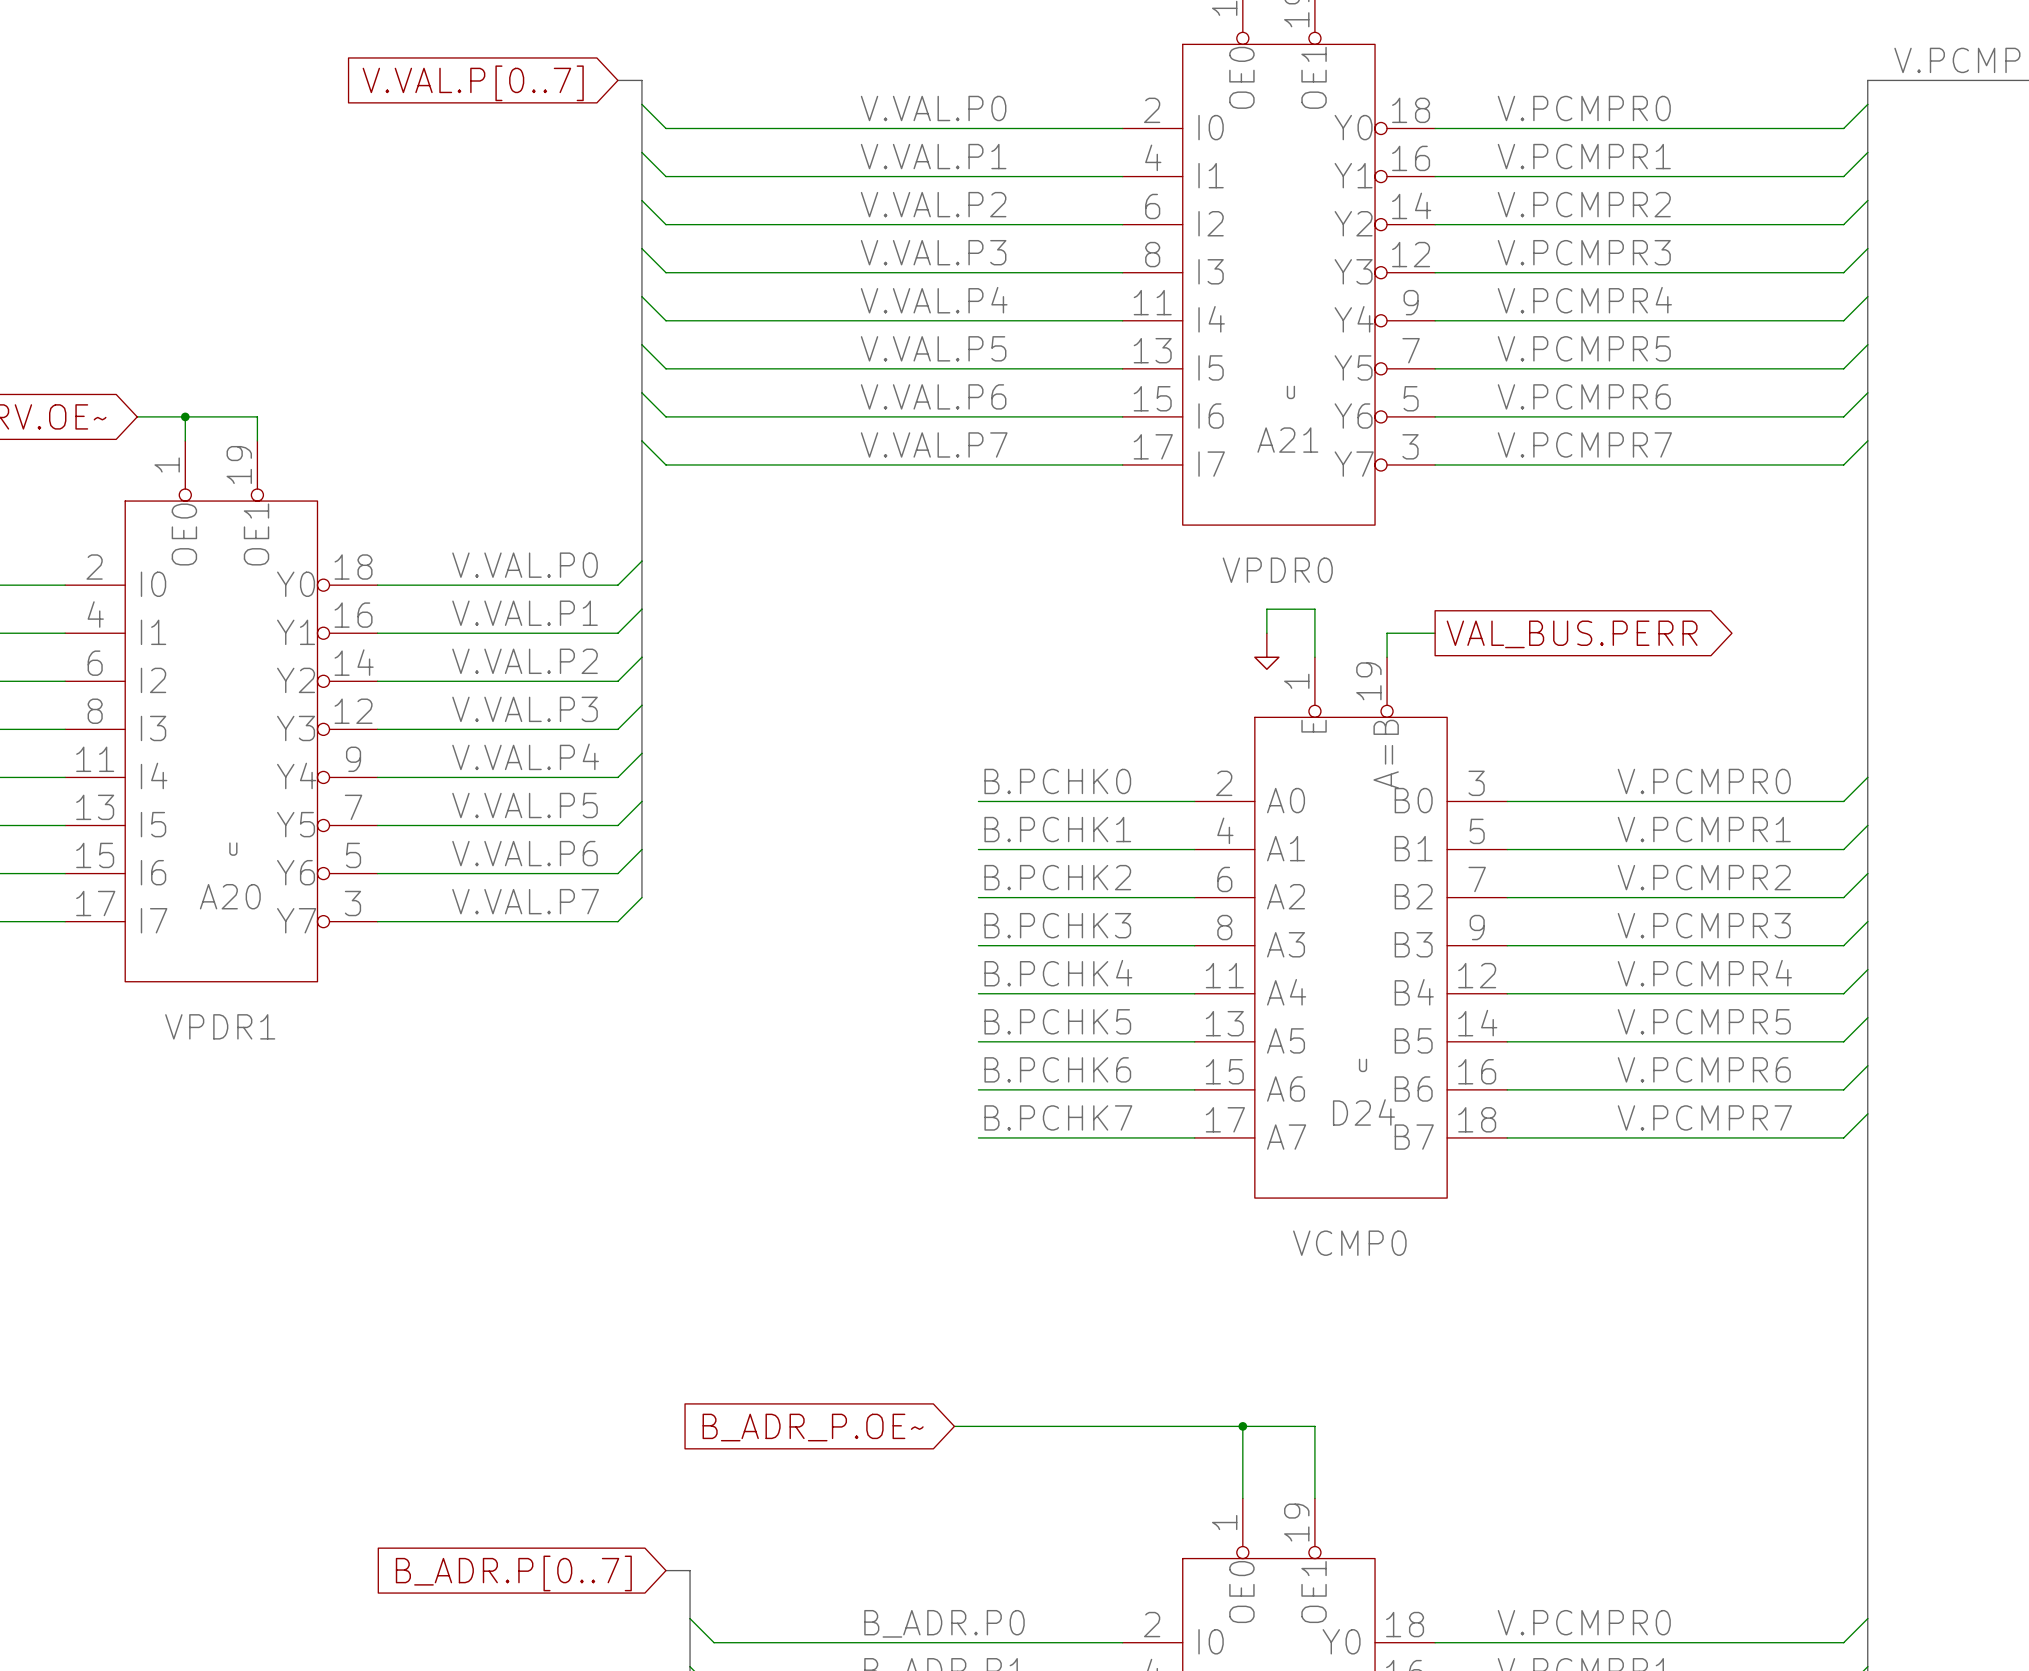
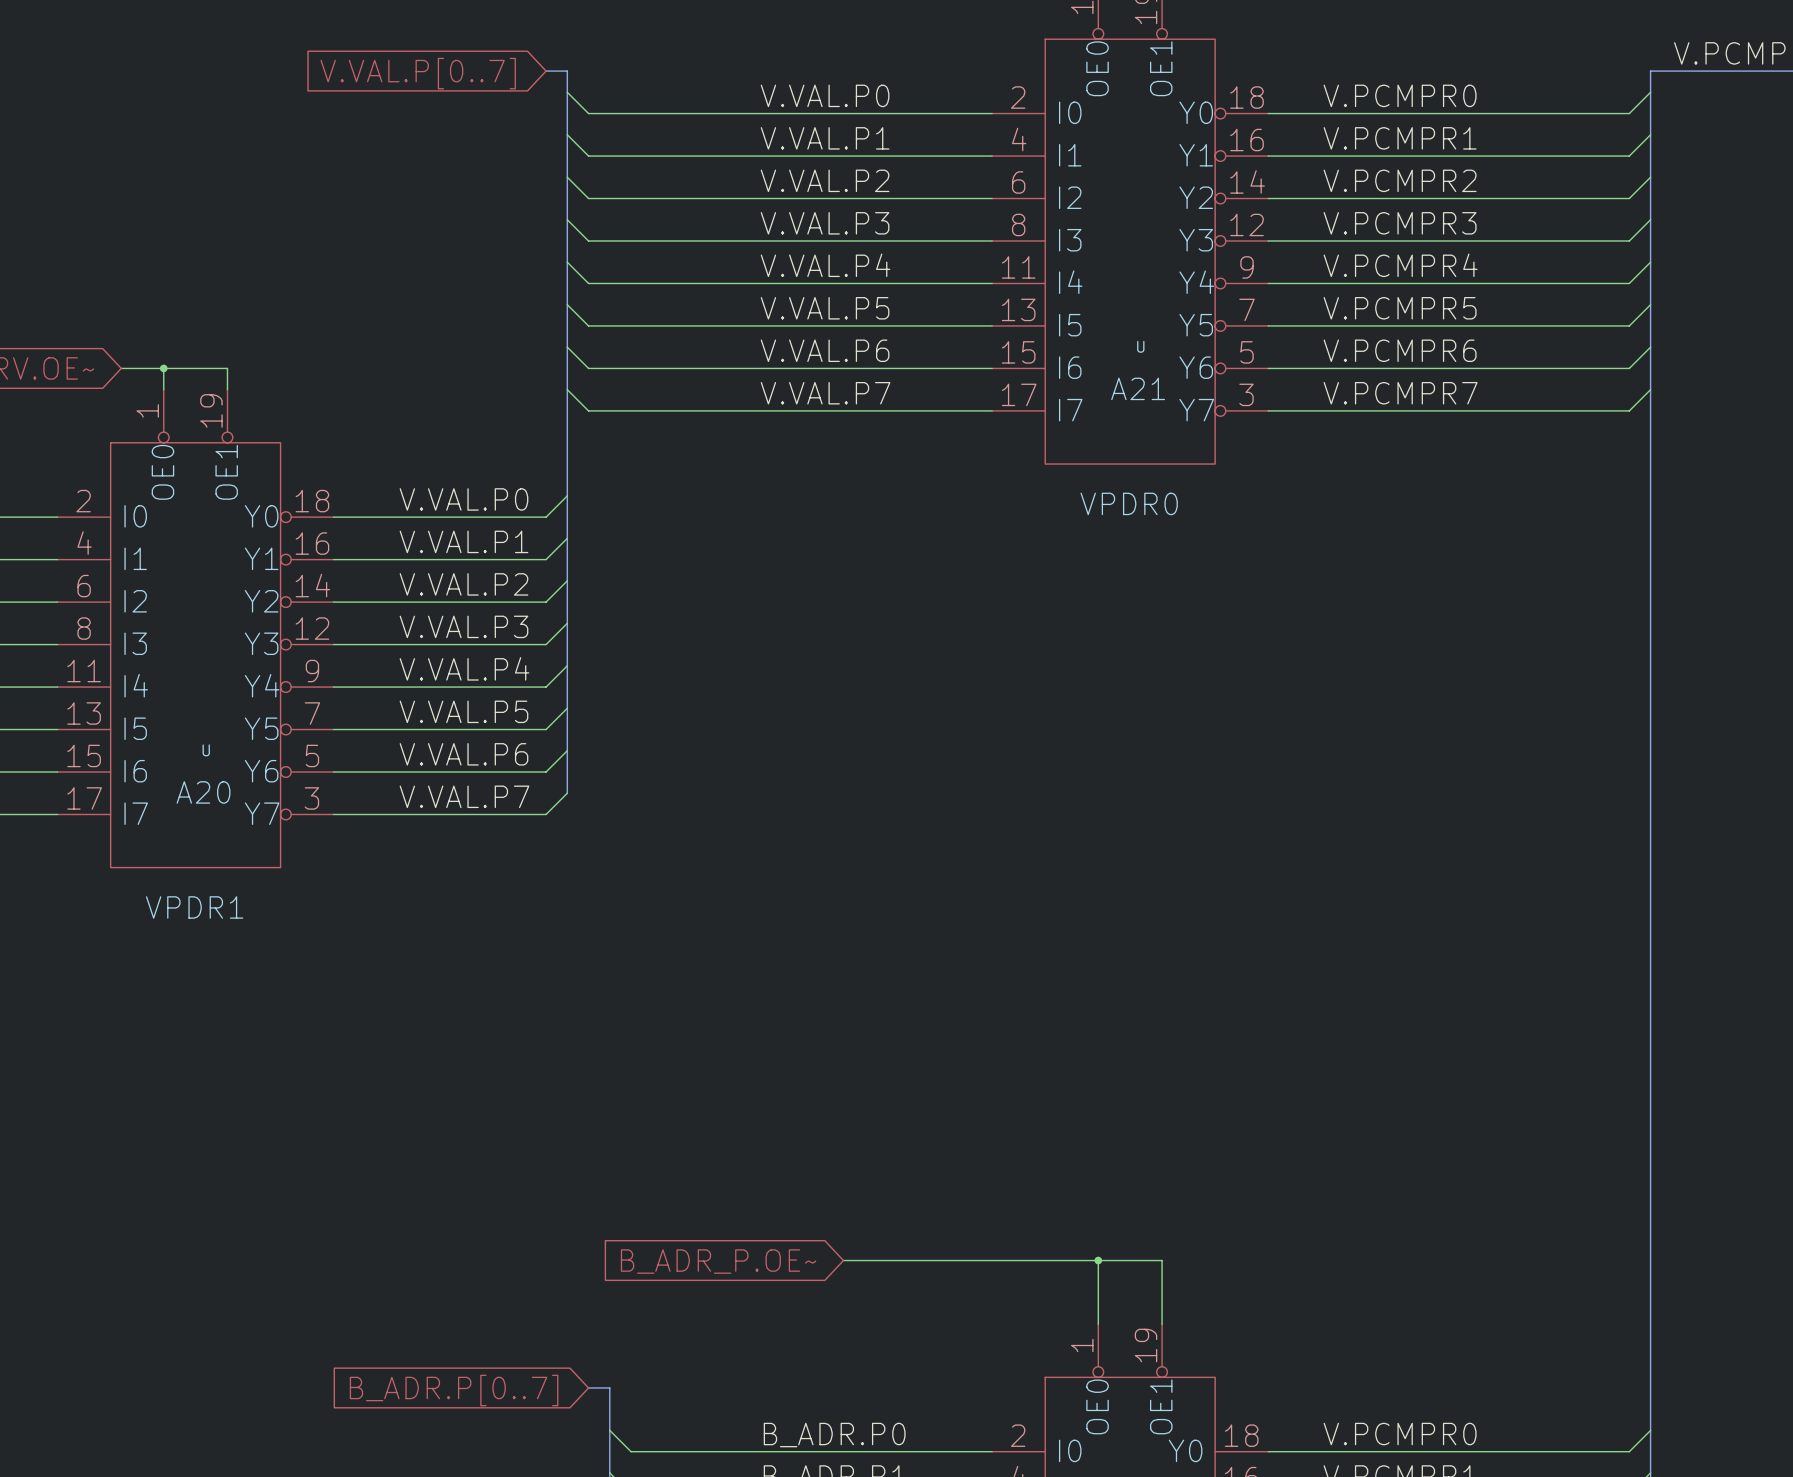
wire: (1266, 633) (1266, 609) (1314, 609) (1314, 657) -> none
wire: (1435, 633) (1387, 633) (1387, 657) -> none
global label: VAL_BUS.PERR (1572, 634) -> none
power symbol: (1266, 651) -> none
wire: (1867, 777) (1843, 801) (1507, 801) -> none
label: B.PCHK0 (1057, 781) -> none
label: V.PCMPR0 (1704, 781) -> none
wire: (978, 801) (1194, 801) -> none
wire: (1867, 825) (1843, 849) (1507, 849) -> none
label: B.PCHK1 (1057, 829) -> none
label: V.PCMPR1 (1704, 829) -> none
wire: (978, 849) (1194, 849) -> none
wire: (1867, 873) (1843, 897) (1507, 897) -> none
label: B.PCHK2 (1057, 877) -> none
label: V.PCMPR2 (1704, 877) -> none
wire: (978, 897) (1194, 897) -> none
wire: (1867, 921) (1843, 945) (1507, 945) -> none
label: B.PCHK3 (1057, 925) -> none
label: V.PCMPR3 (1704, 925) -> none
U: (1350, 927) -> none
wire: (978, 945) (1194, 945) -> none
wire: (1867, 969) (1843, 993) (1507, 993) -> none
label: B.PCHK4 (1058, 973) -> none
label: V.PCMPR4 (1704, 973) -> none
wire: (978, 993) (1194, 993) -> none
wire: (1867, 1017) (1843, 1041) (1507, 1041) -> none
label: B.PCHK5 (1057, 1021) -> none
label: V.PCMPR5 (1704, 1021) -> none
wire: (978, 1041) (1194, 1041) -> none
wire: (1867, 1065) (1843, 1089) (1507, 1089) -> none
label: B.PCHK6 (1057, 1069) -> none
label: V.PCMPR6 (1704, 1069) -> none
wire: (978, 1089) (1194, 1089) -> none
wire: (1867, 1113) (1843, 1137) (1507, 1137) -> none
label: B.PCHK7 (1058, 1117) -> none
label: V.PCMPR7 (1704, 1117) -> none
wire: (978, 1137) (1194, 1137) -> none

